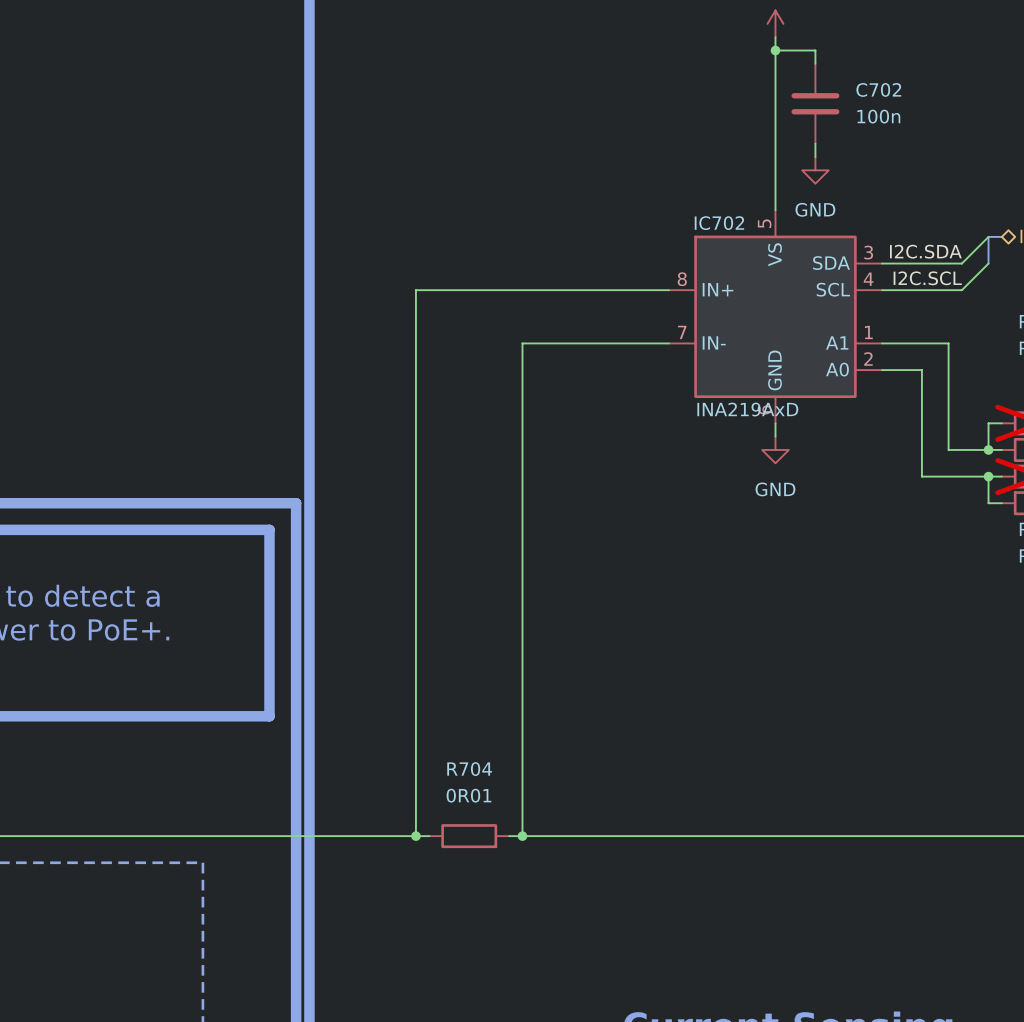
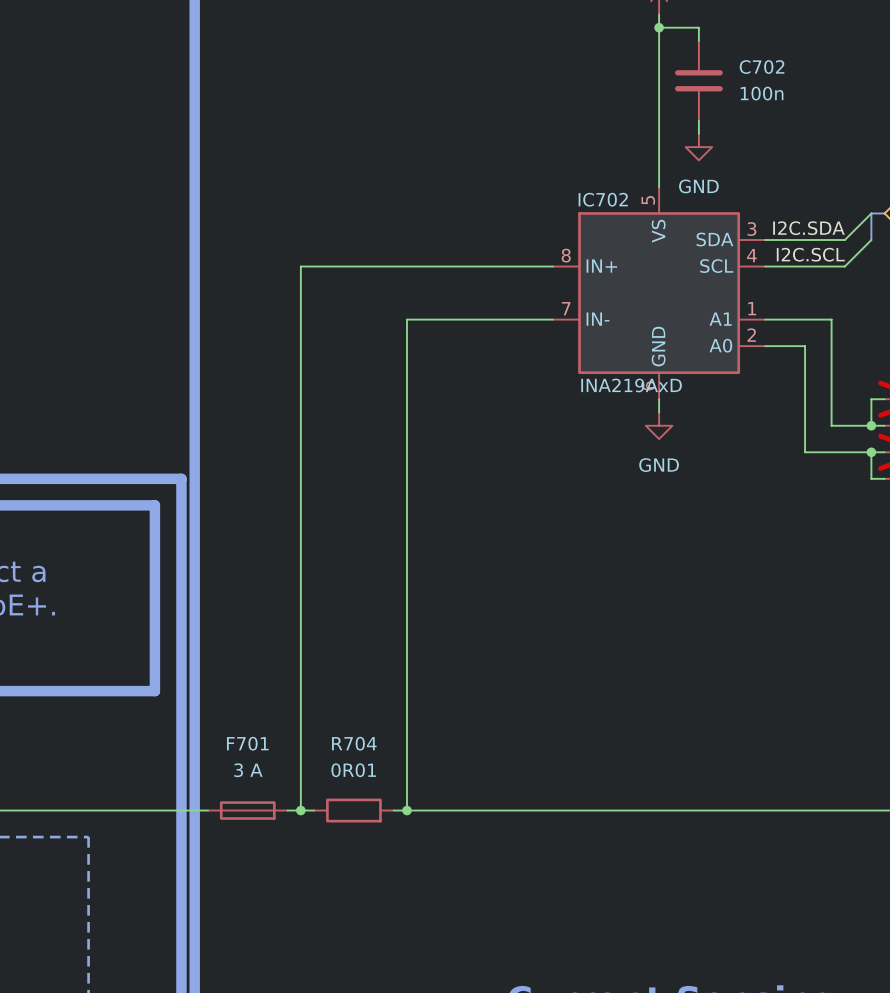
F701: none -> 3 A (247, 810)

